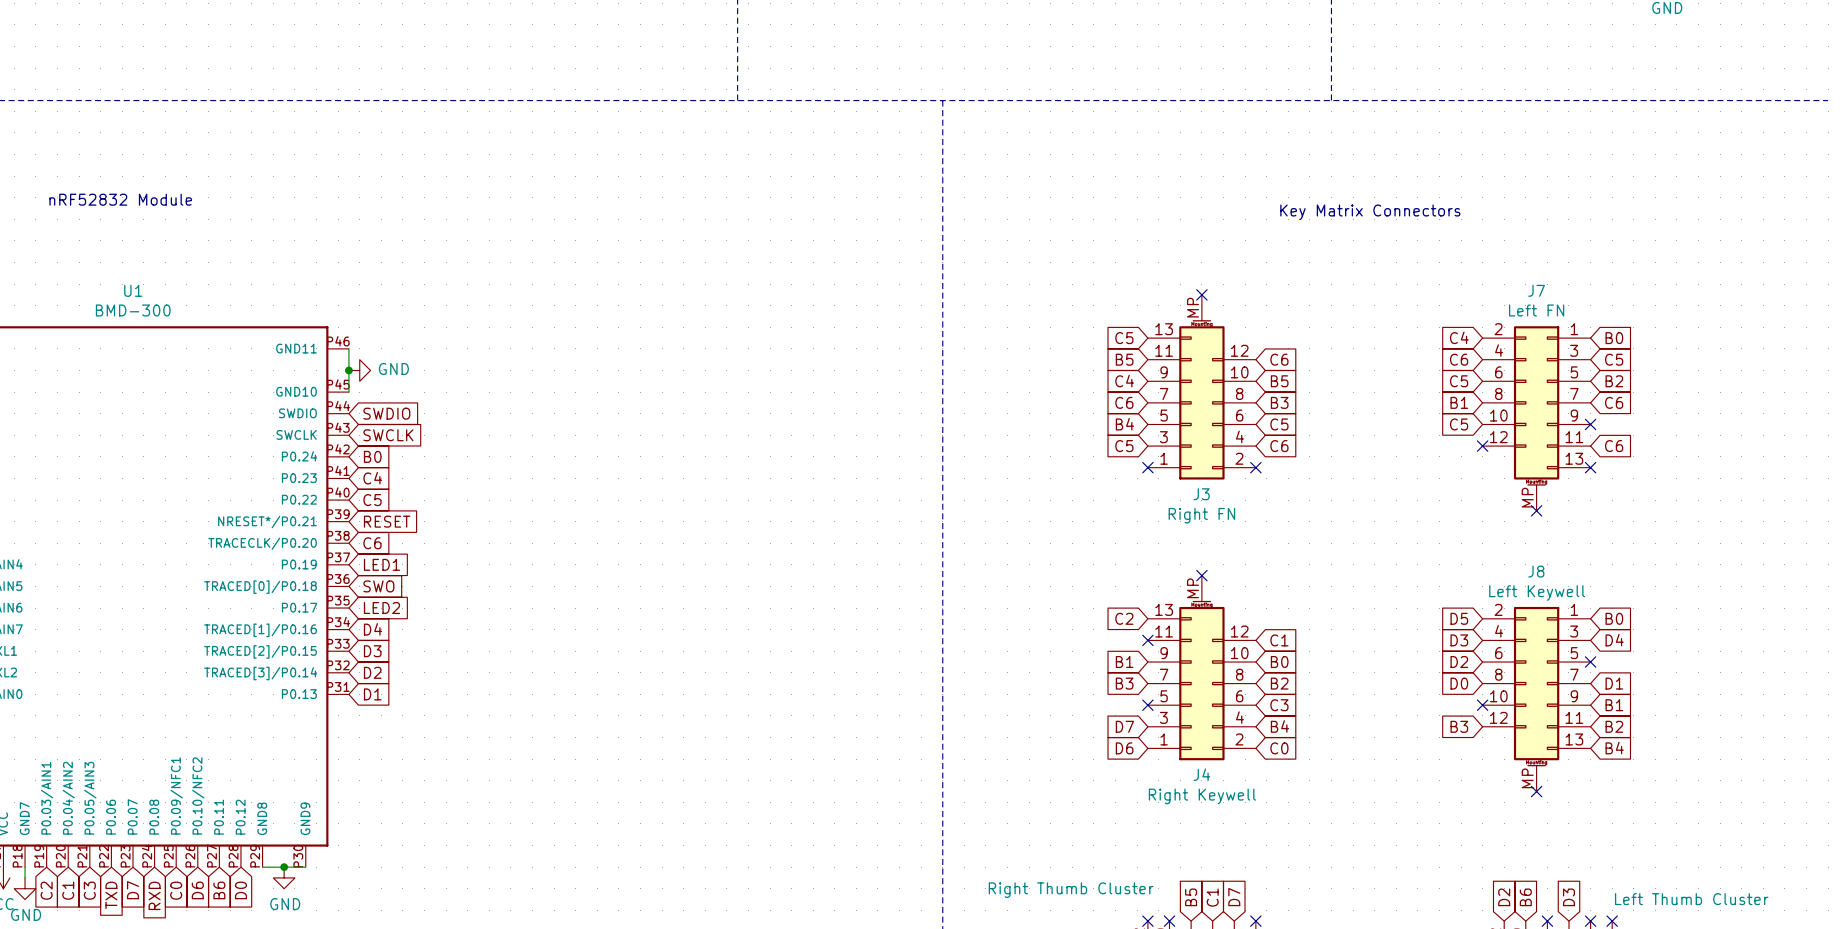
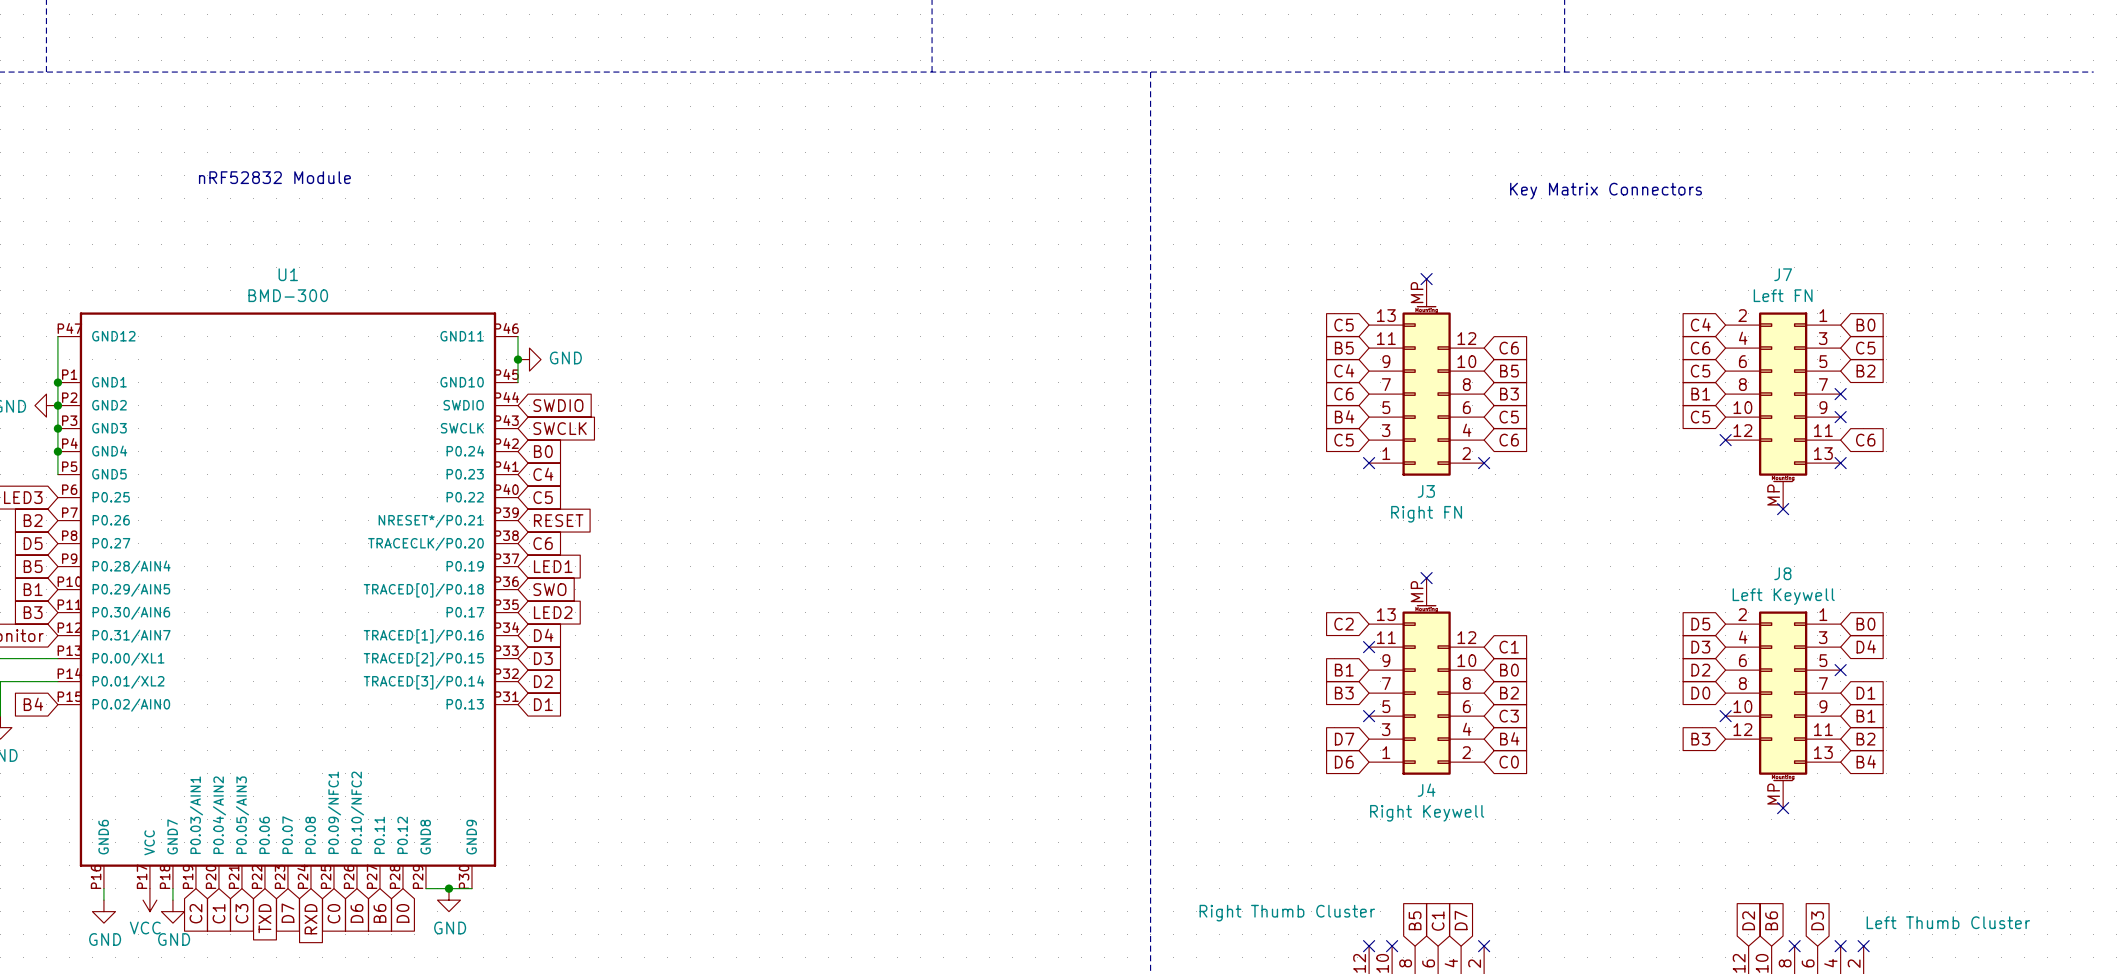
no-connect mark: none -> (1840, 394)
global label: C6 (1614, 402) -> none

